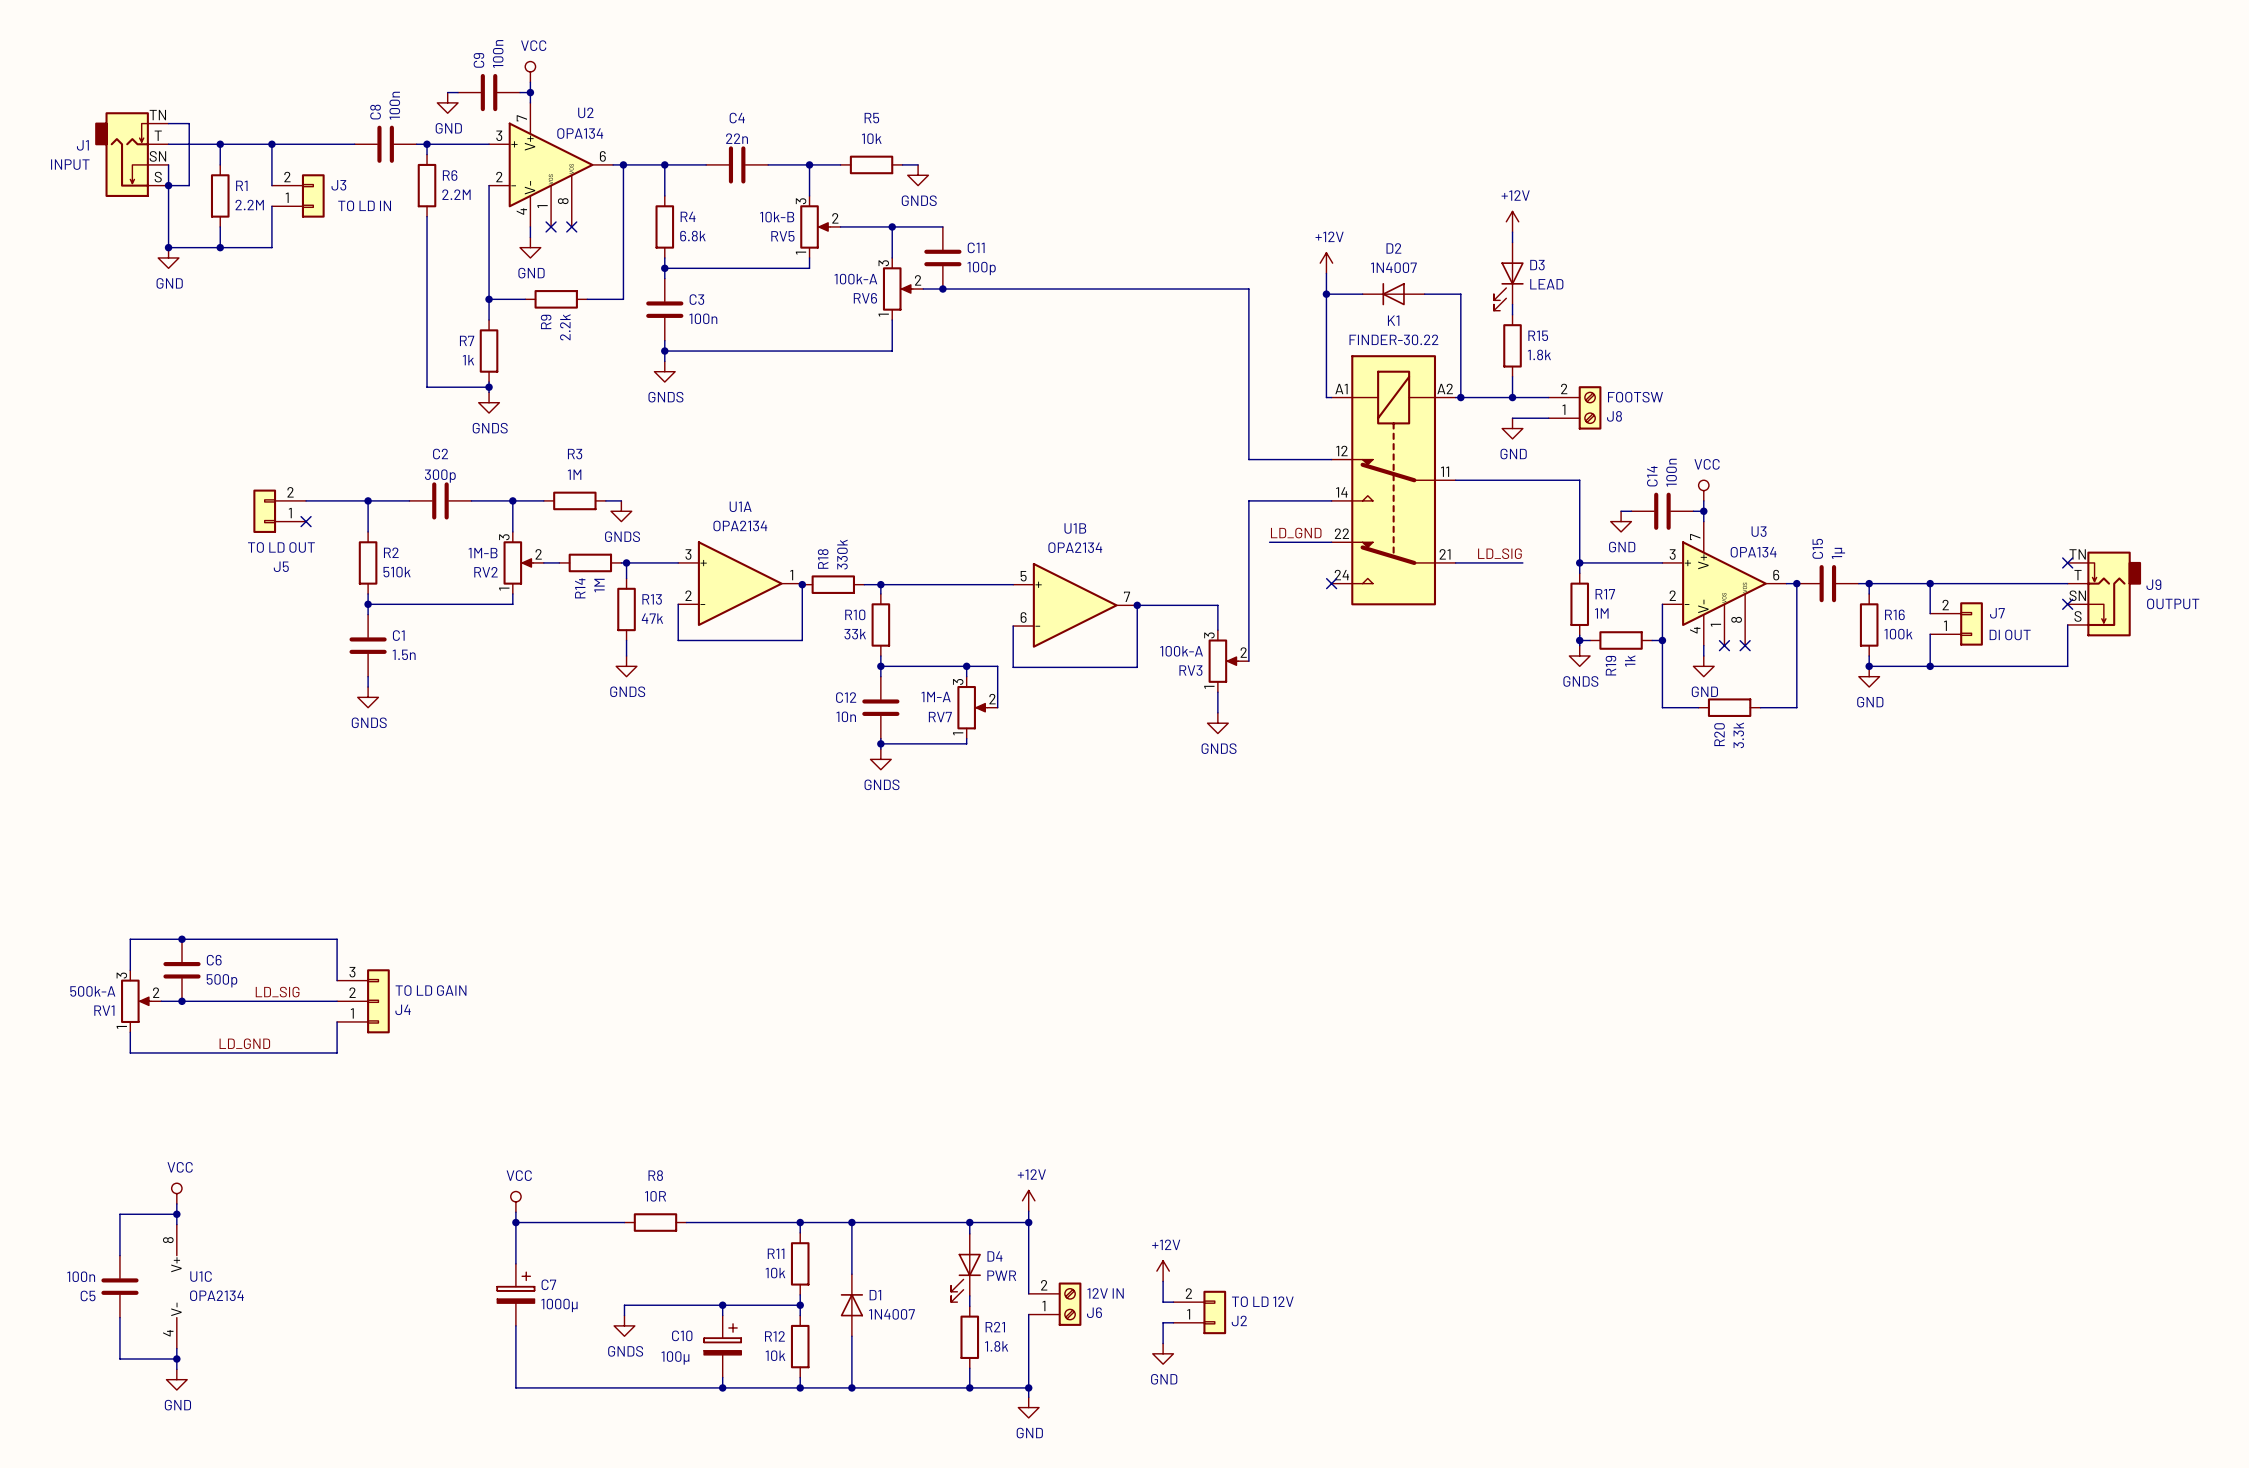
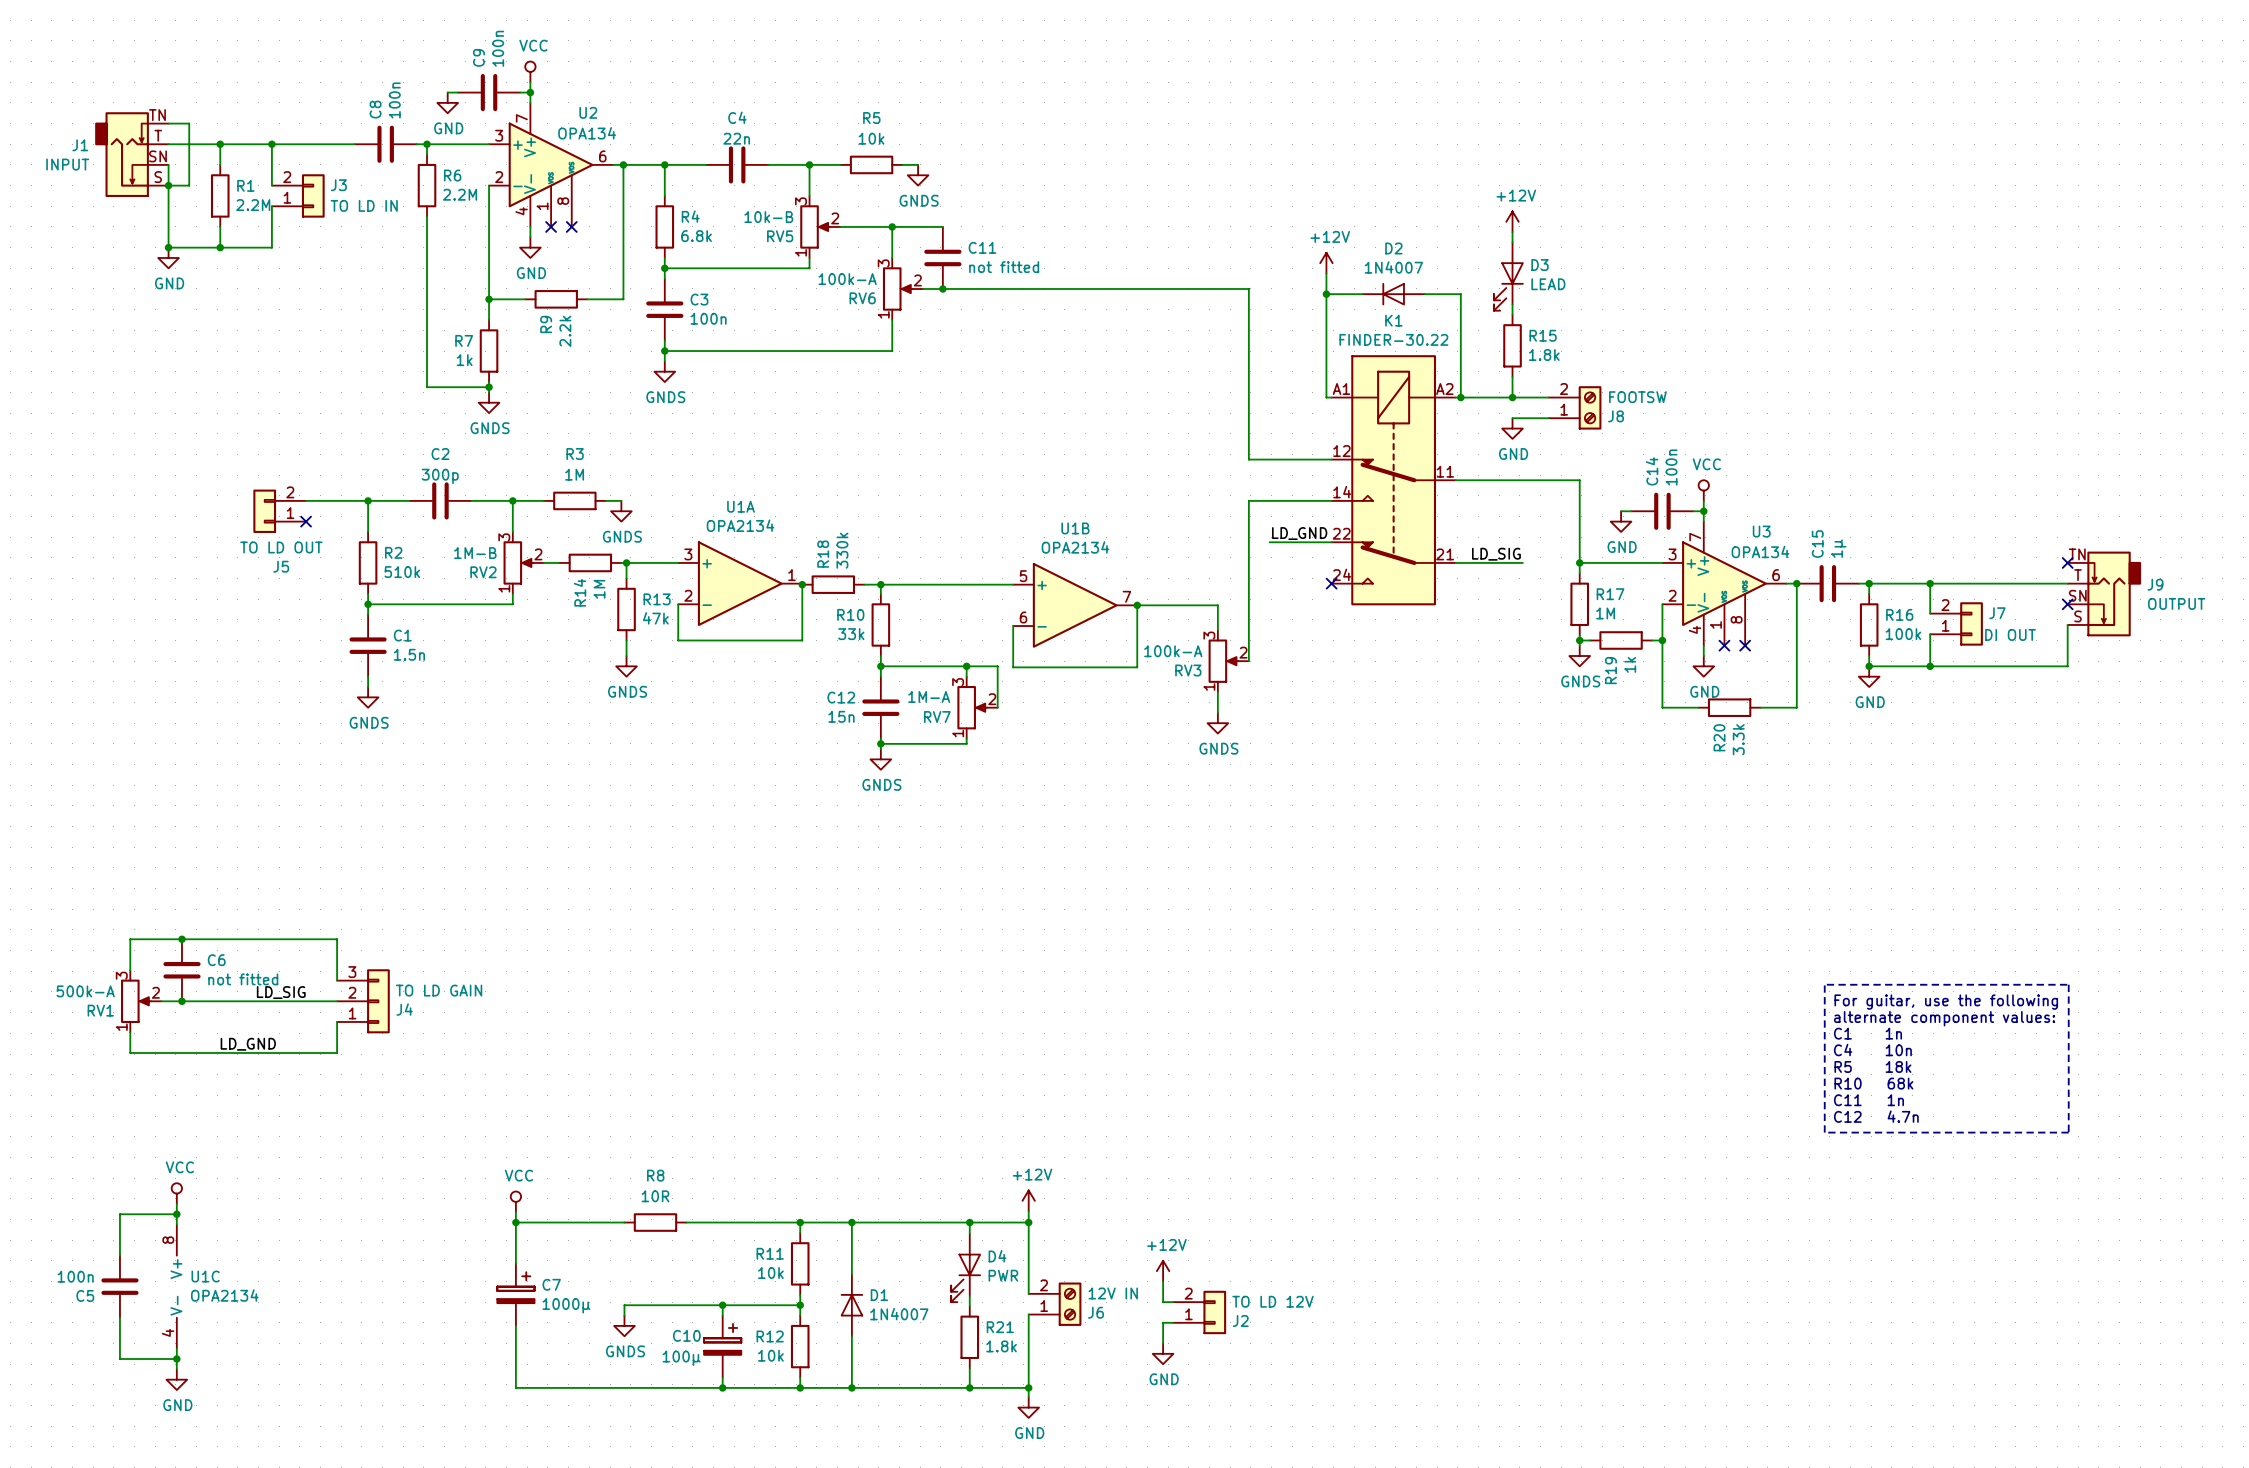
C11 value: 100p (981, 268) -> not fitted (1004, 267)
C12 value: 10n (846, 716) -> 15n (841, 716)
C6 value: 500p (222, 980) -> not fitted (243, 979)
line: none -> (1824, 984) (1824, 1132) (2068, 1132) (2068, 984) (1826, 984)
text: none -> For guitar, use the following (1946, 1002)
text: none -> alternate component values: (1944, 1018)
text: none -> C1 1n (1867, 1033)
text: none -> C4 10n (1872, 1050)
text: none -> R5 18k (1872, 1066)
text: none -> R10 68k (1873, 1083)
text: none -> C11 1n (1868, 1100)
text: none -> C12 4.7n (1876, 1116)

